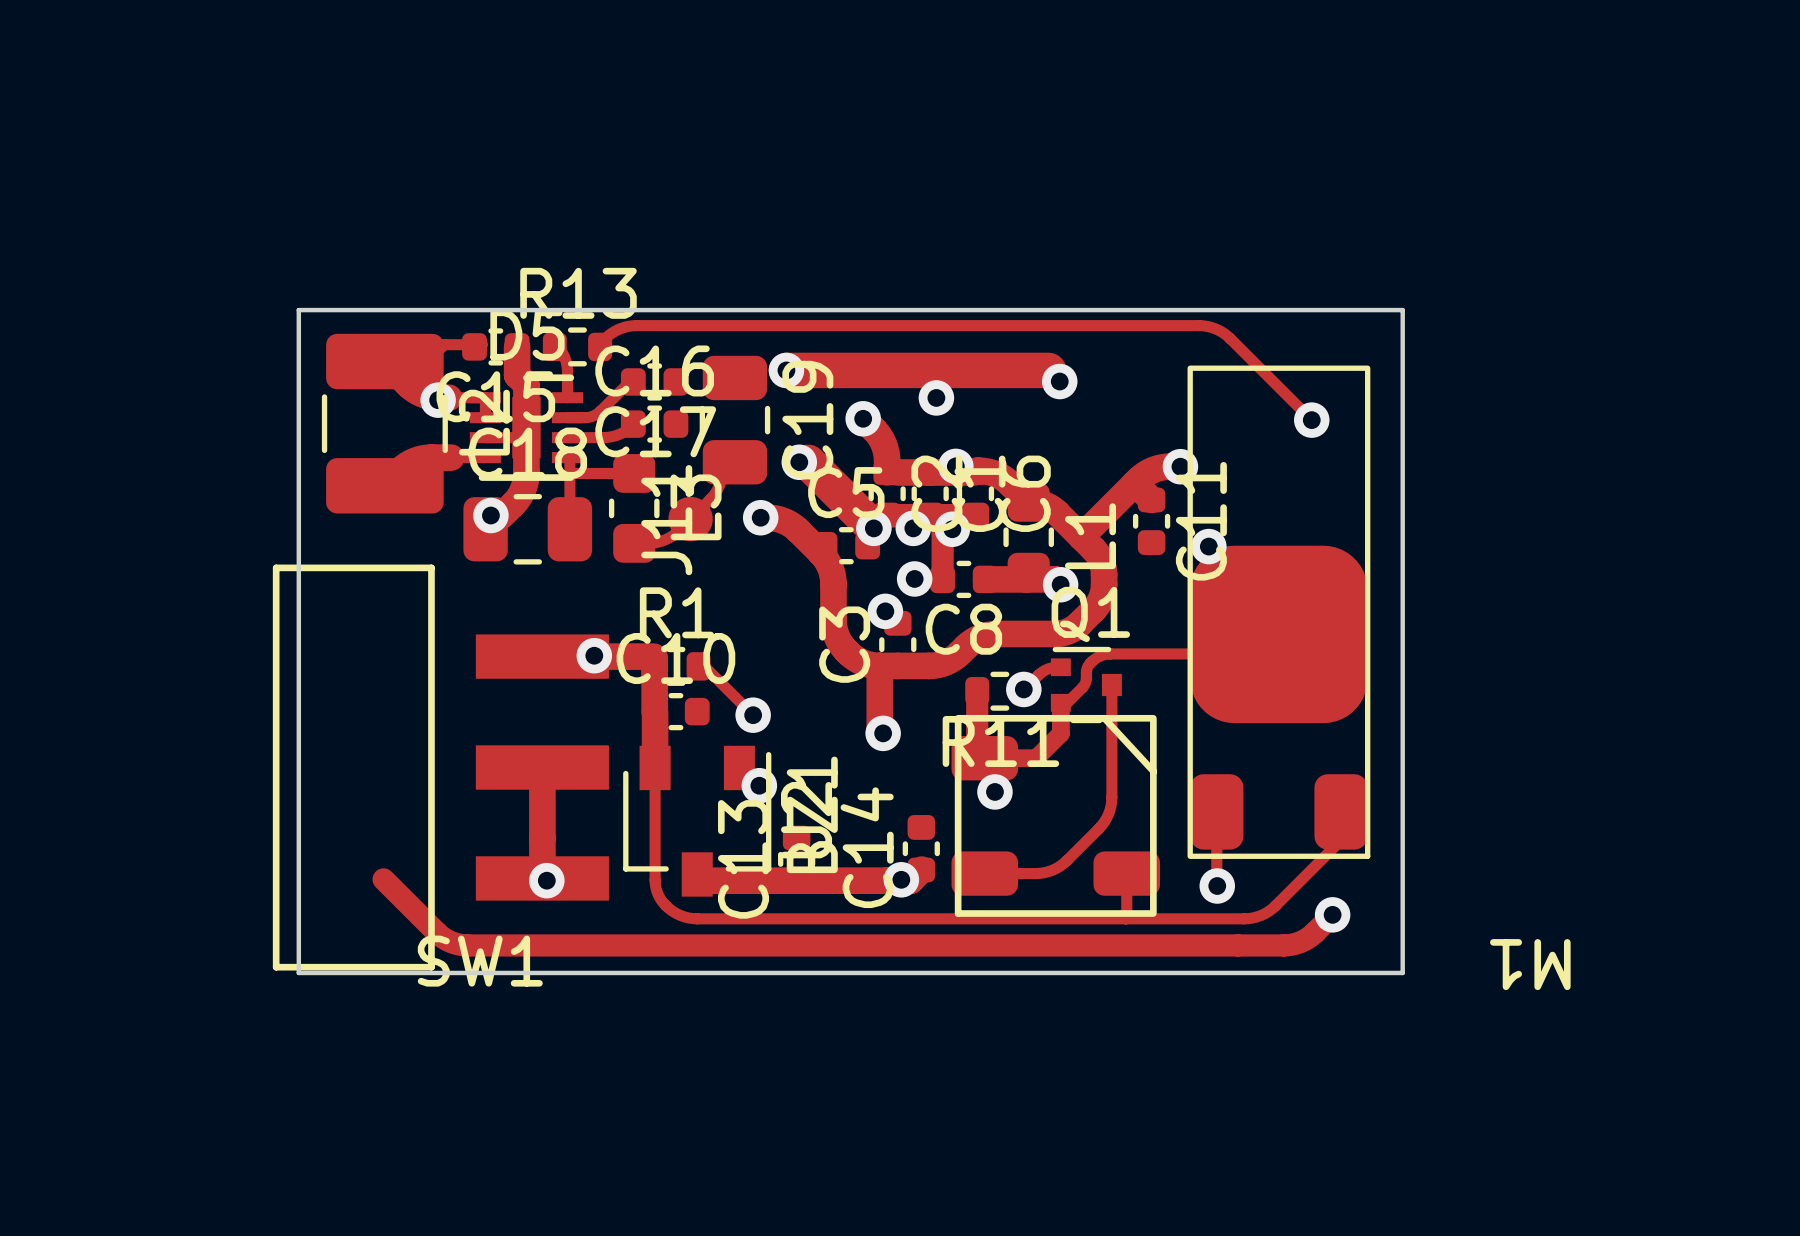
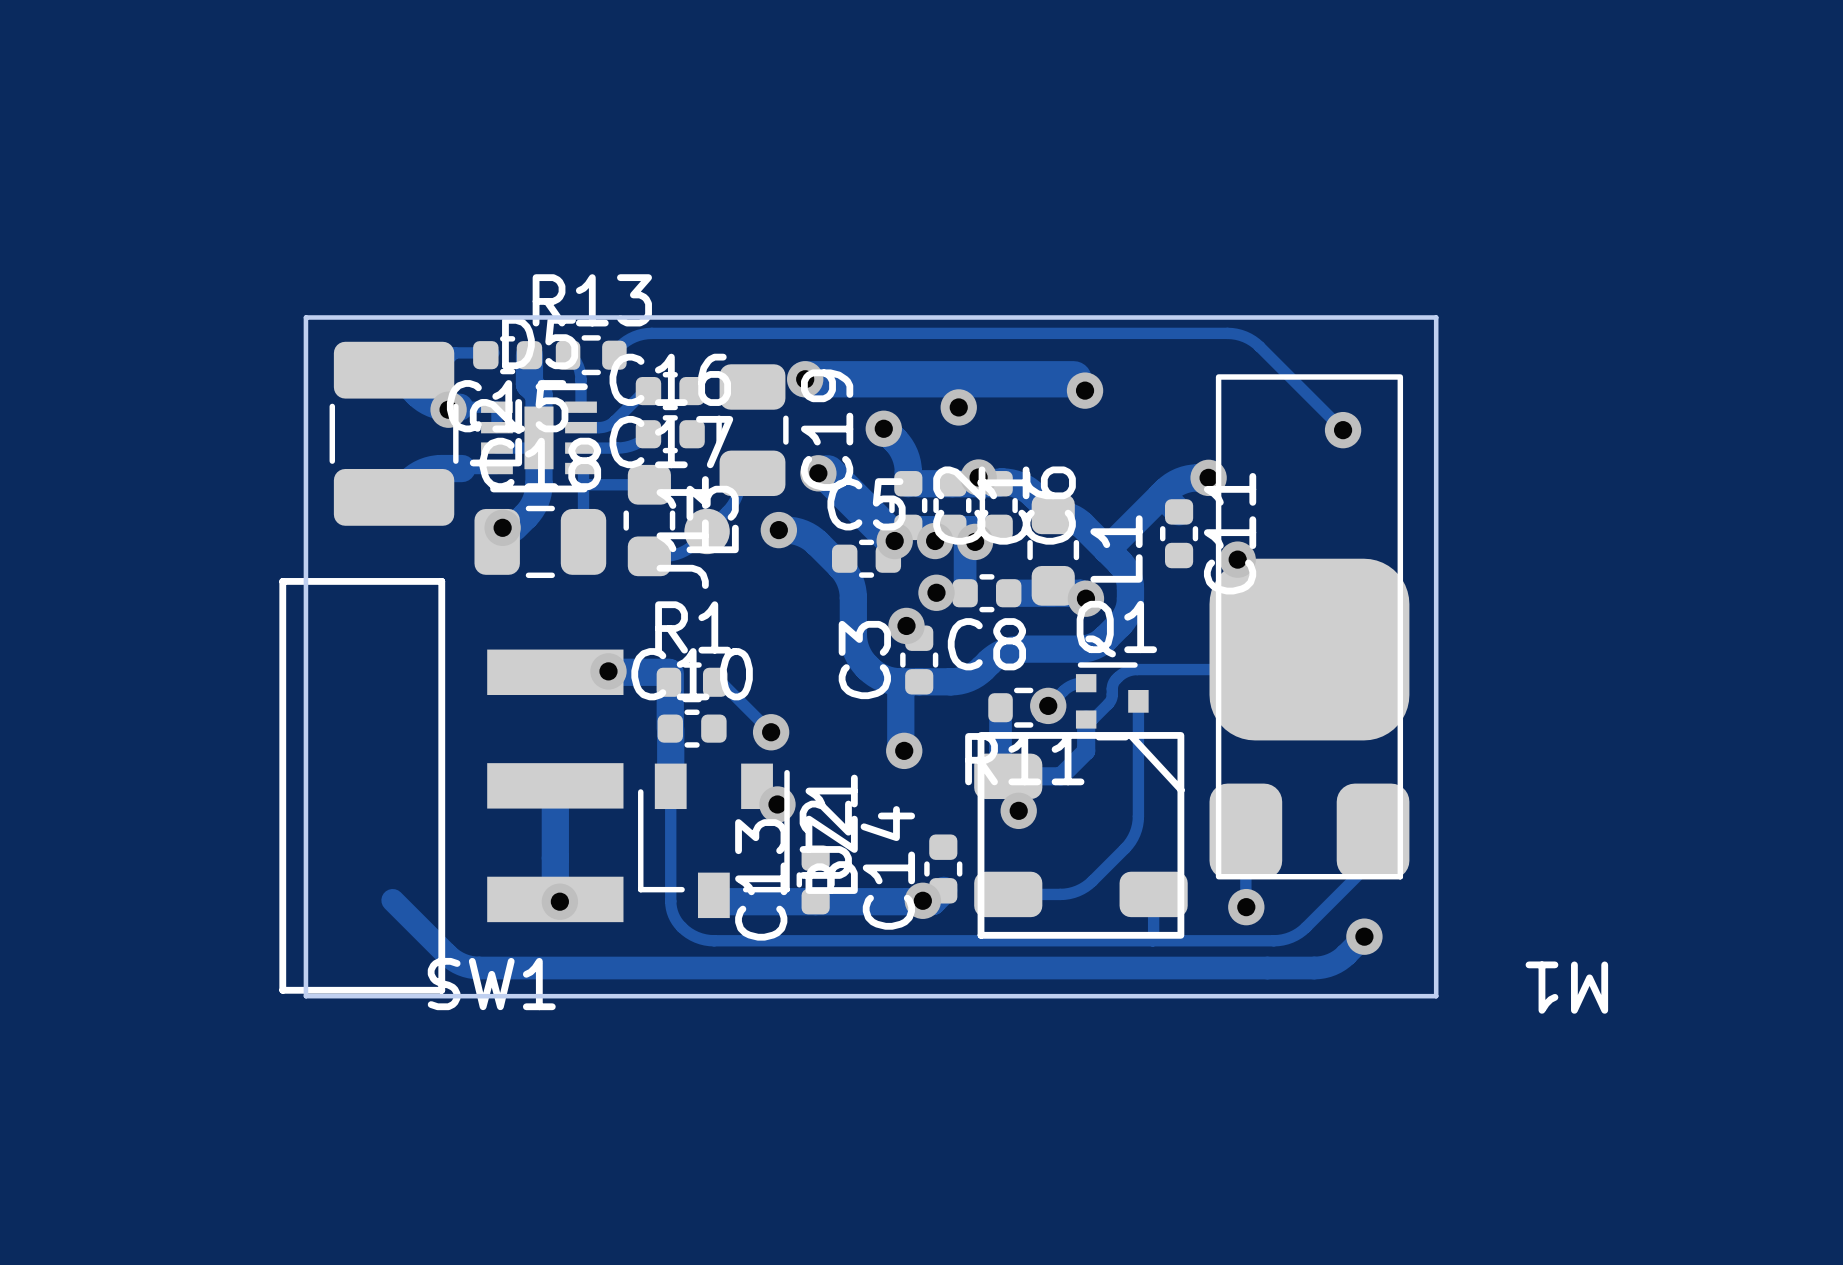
M1 footprint: [1187, 365, 1371, 859] -> [1209, 374, 1410, 880]

